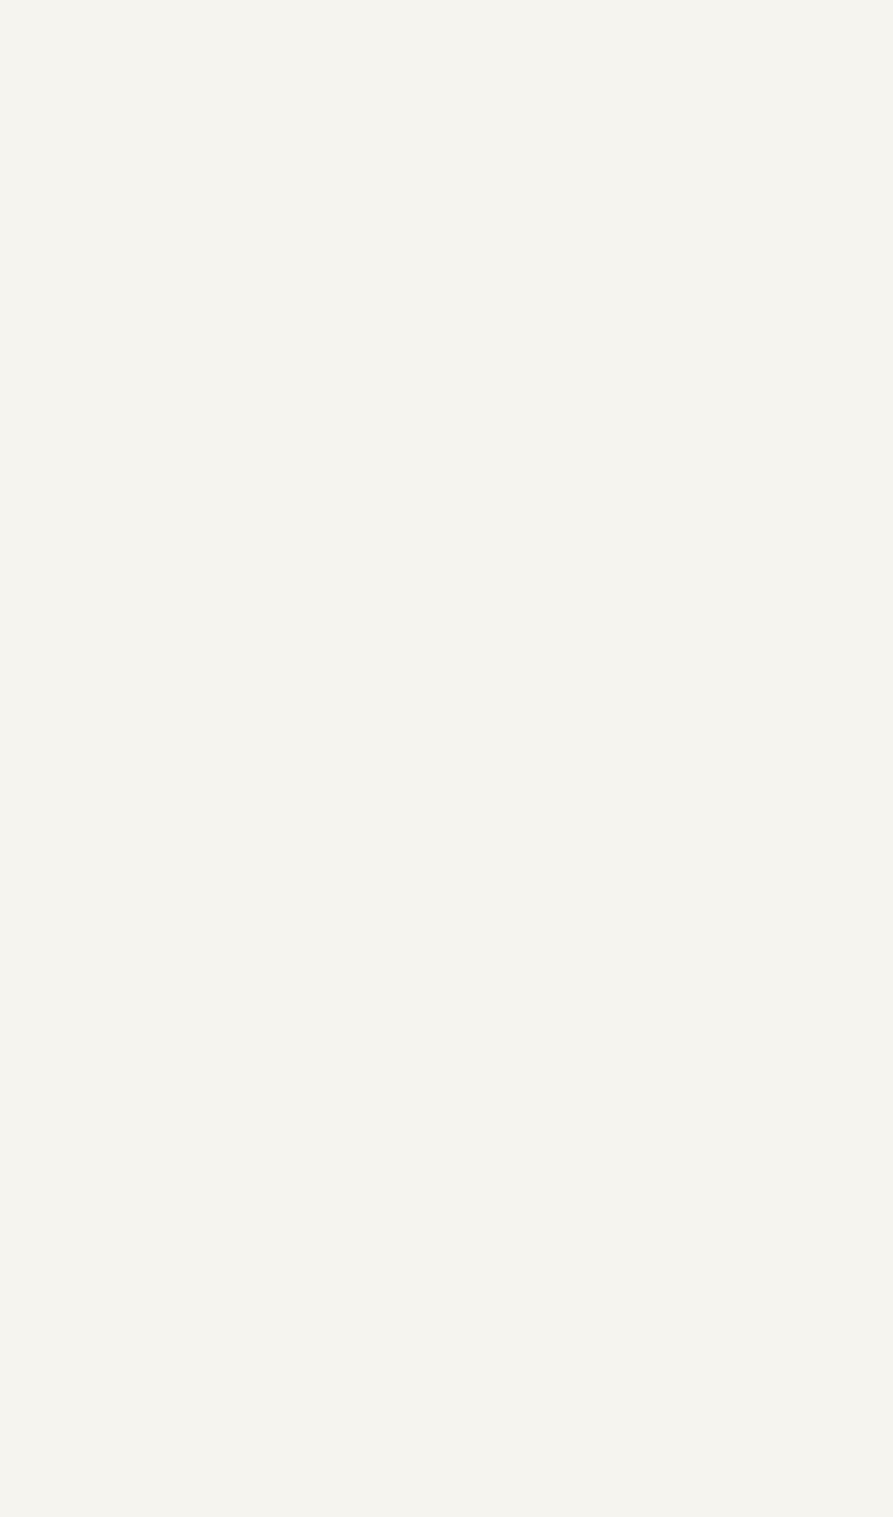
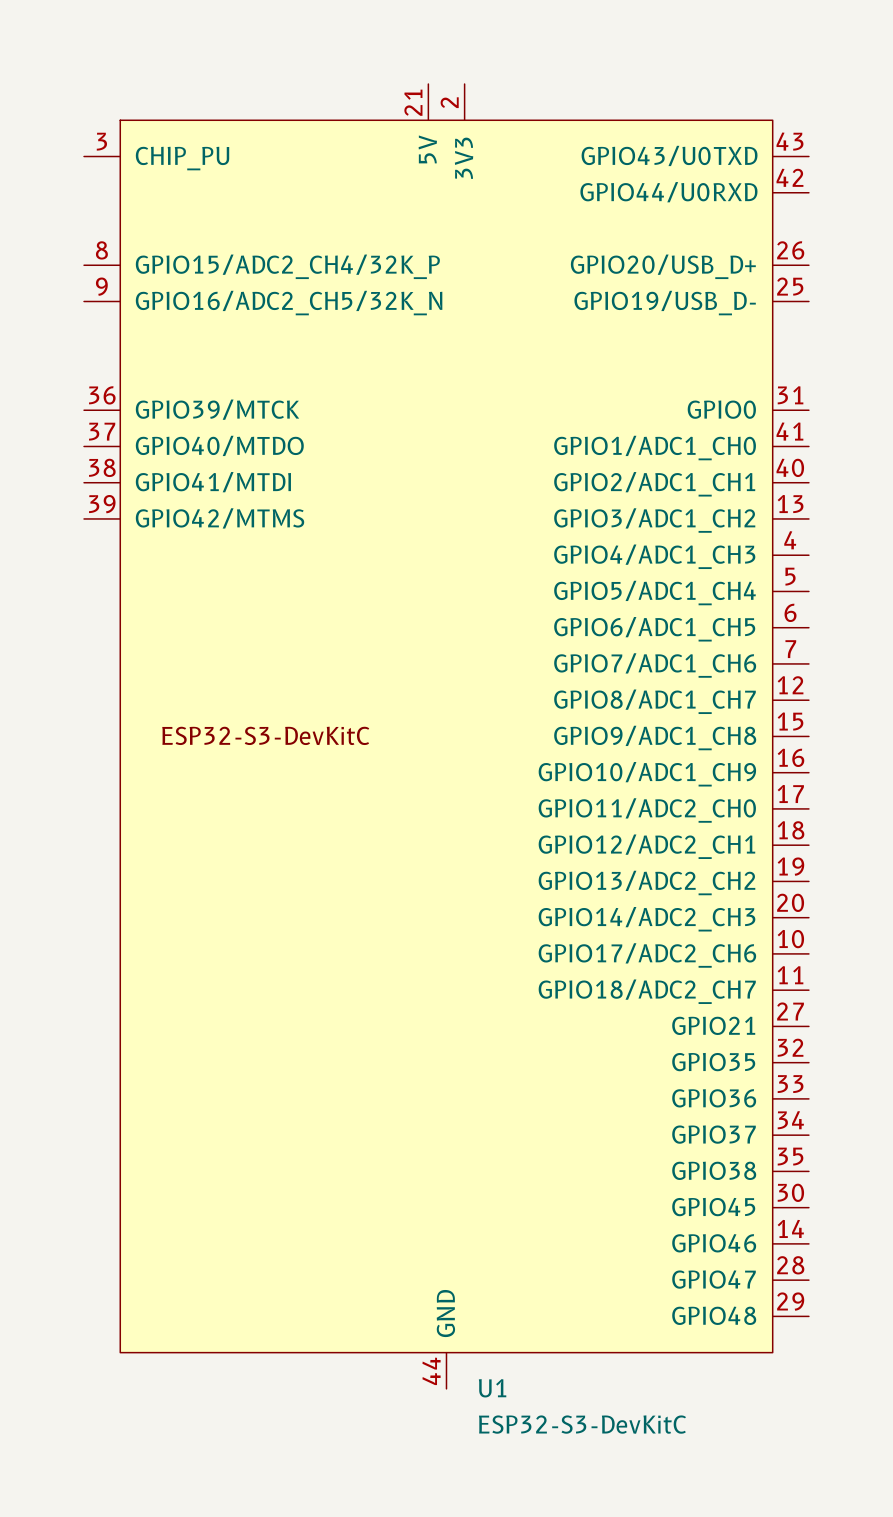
U1: none -> ESP32-S3-DevKitC (446, 736)

